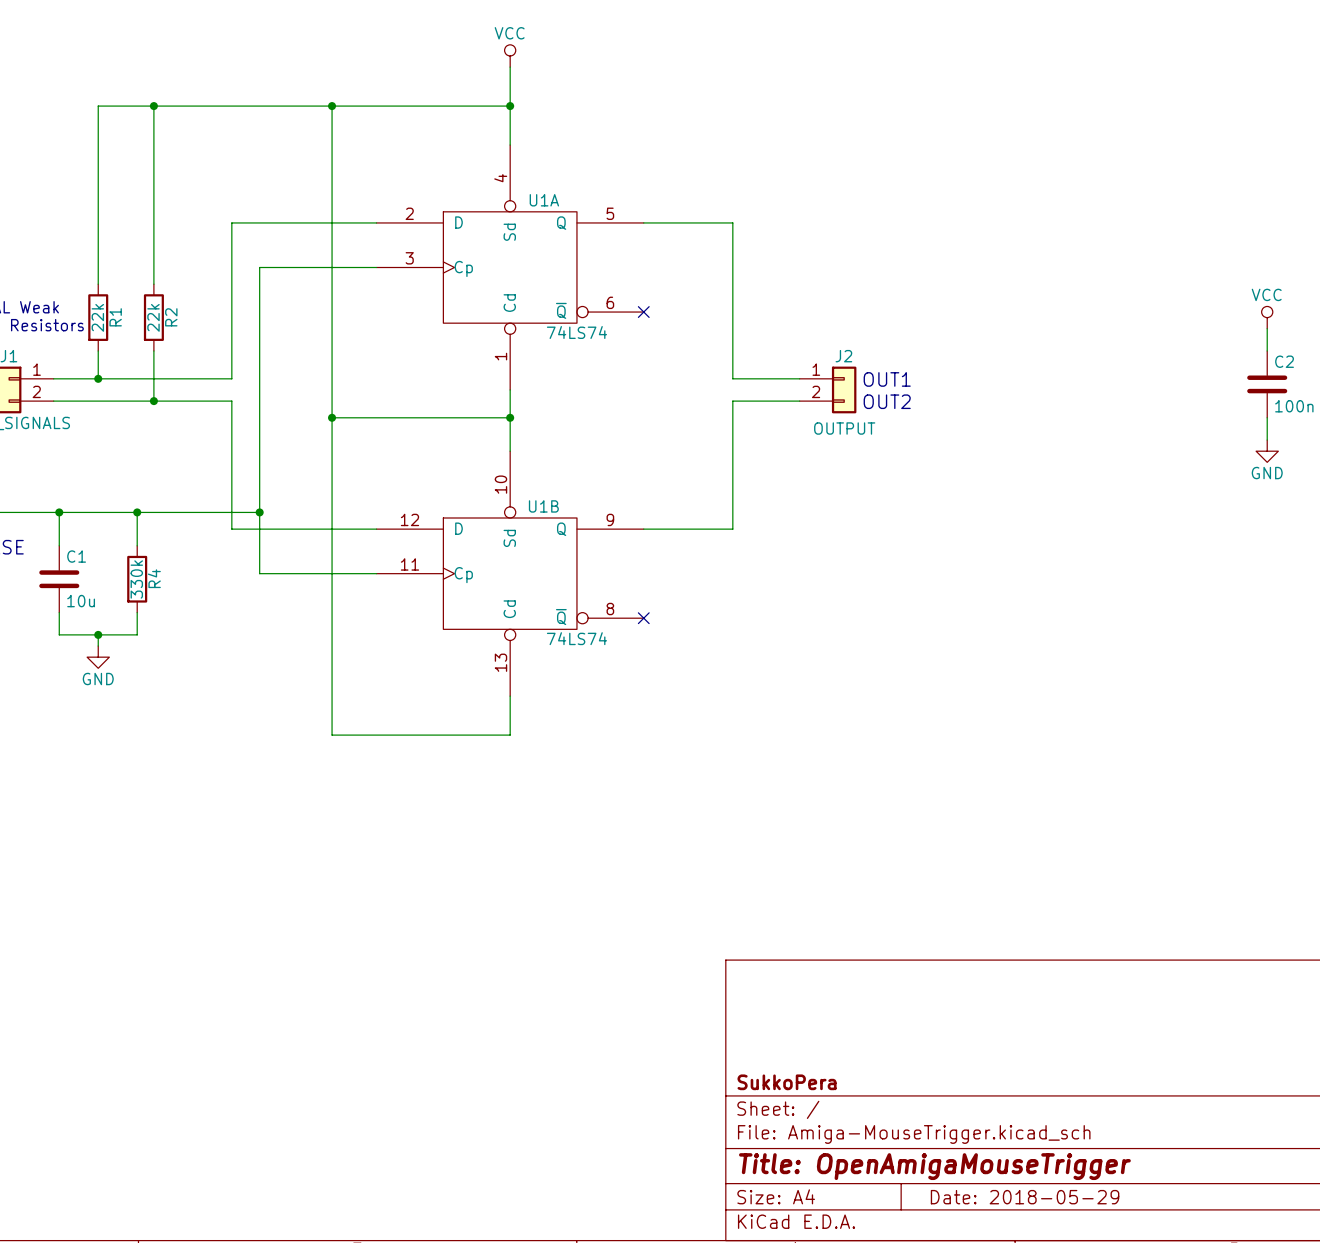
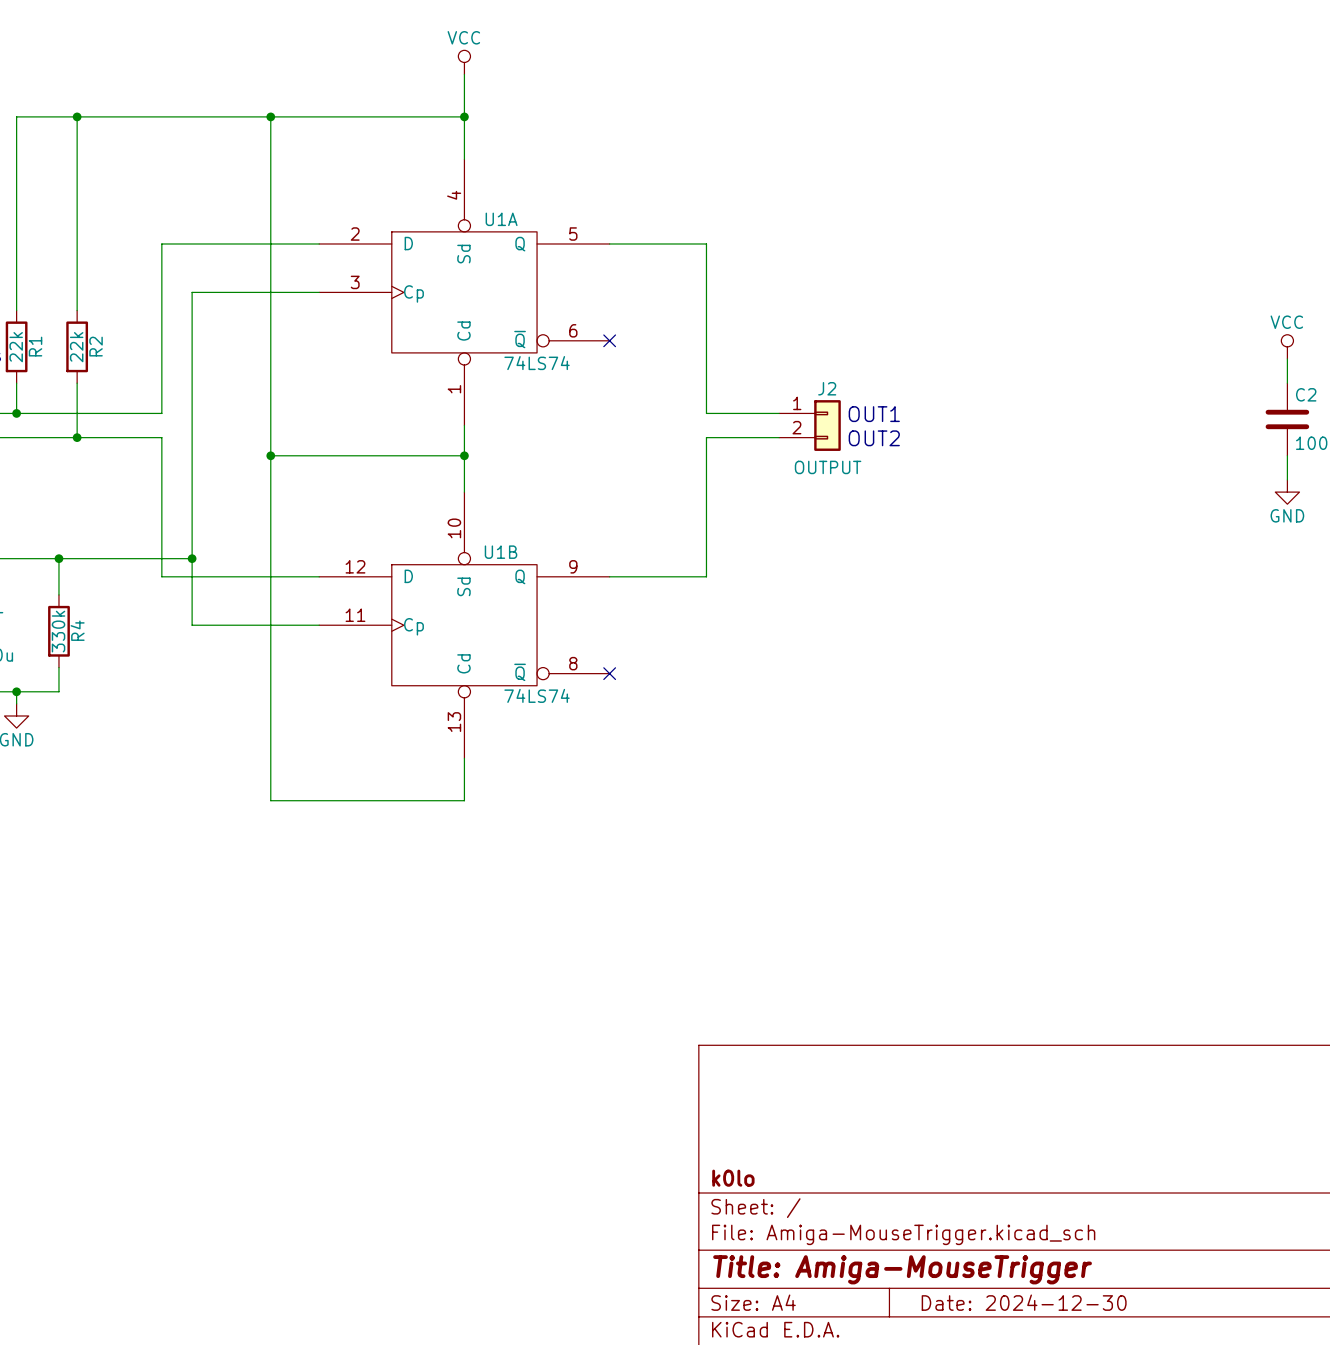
title block: SukkoPera (787, 1082) -> k0lo (733, 1178)
title block: Title: OpenAmigaMouseTrigger (934, 1166) -> Title: Amiga-MouseTrigger (902, 1269)
title block: Date: 2018-05-29 (1025, 1197) -> Date: 2024-12-30 (1024, 1302)

